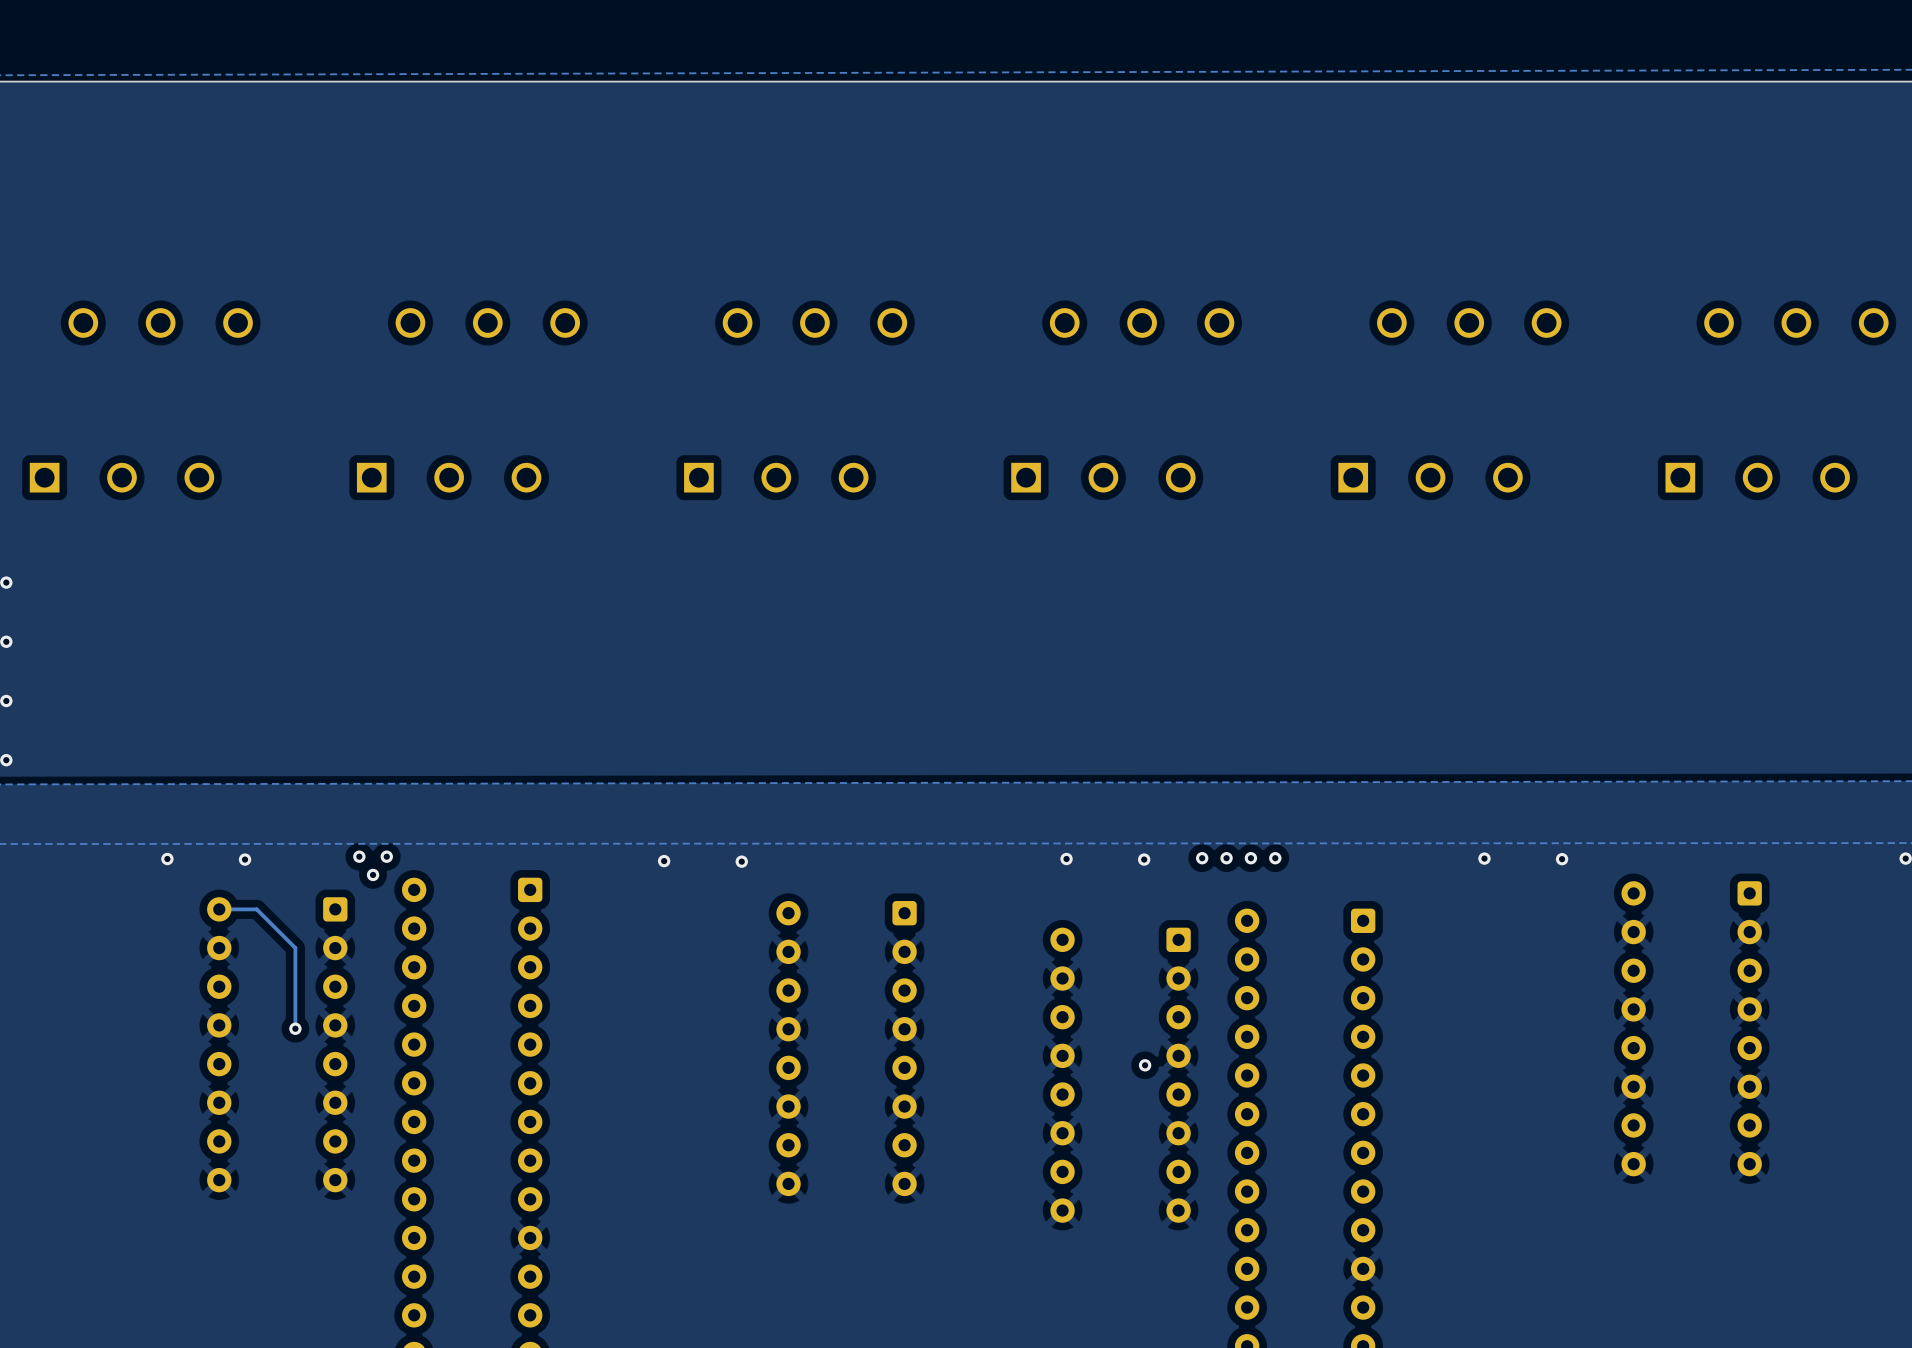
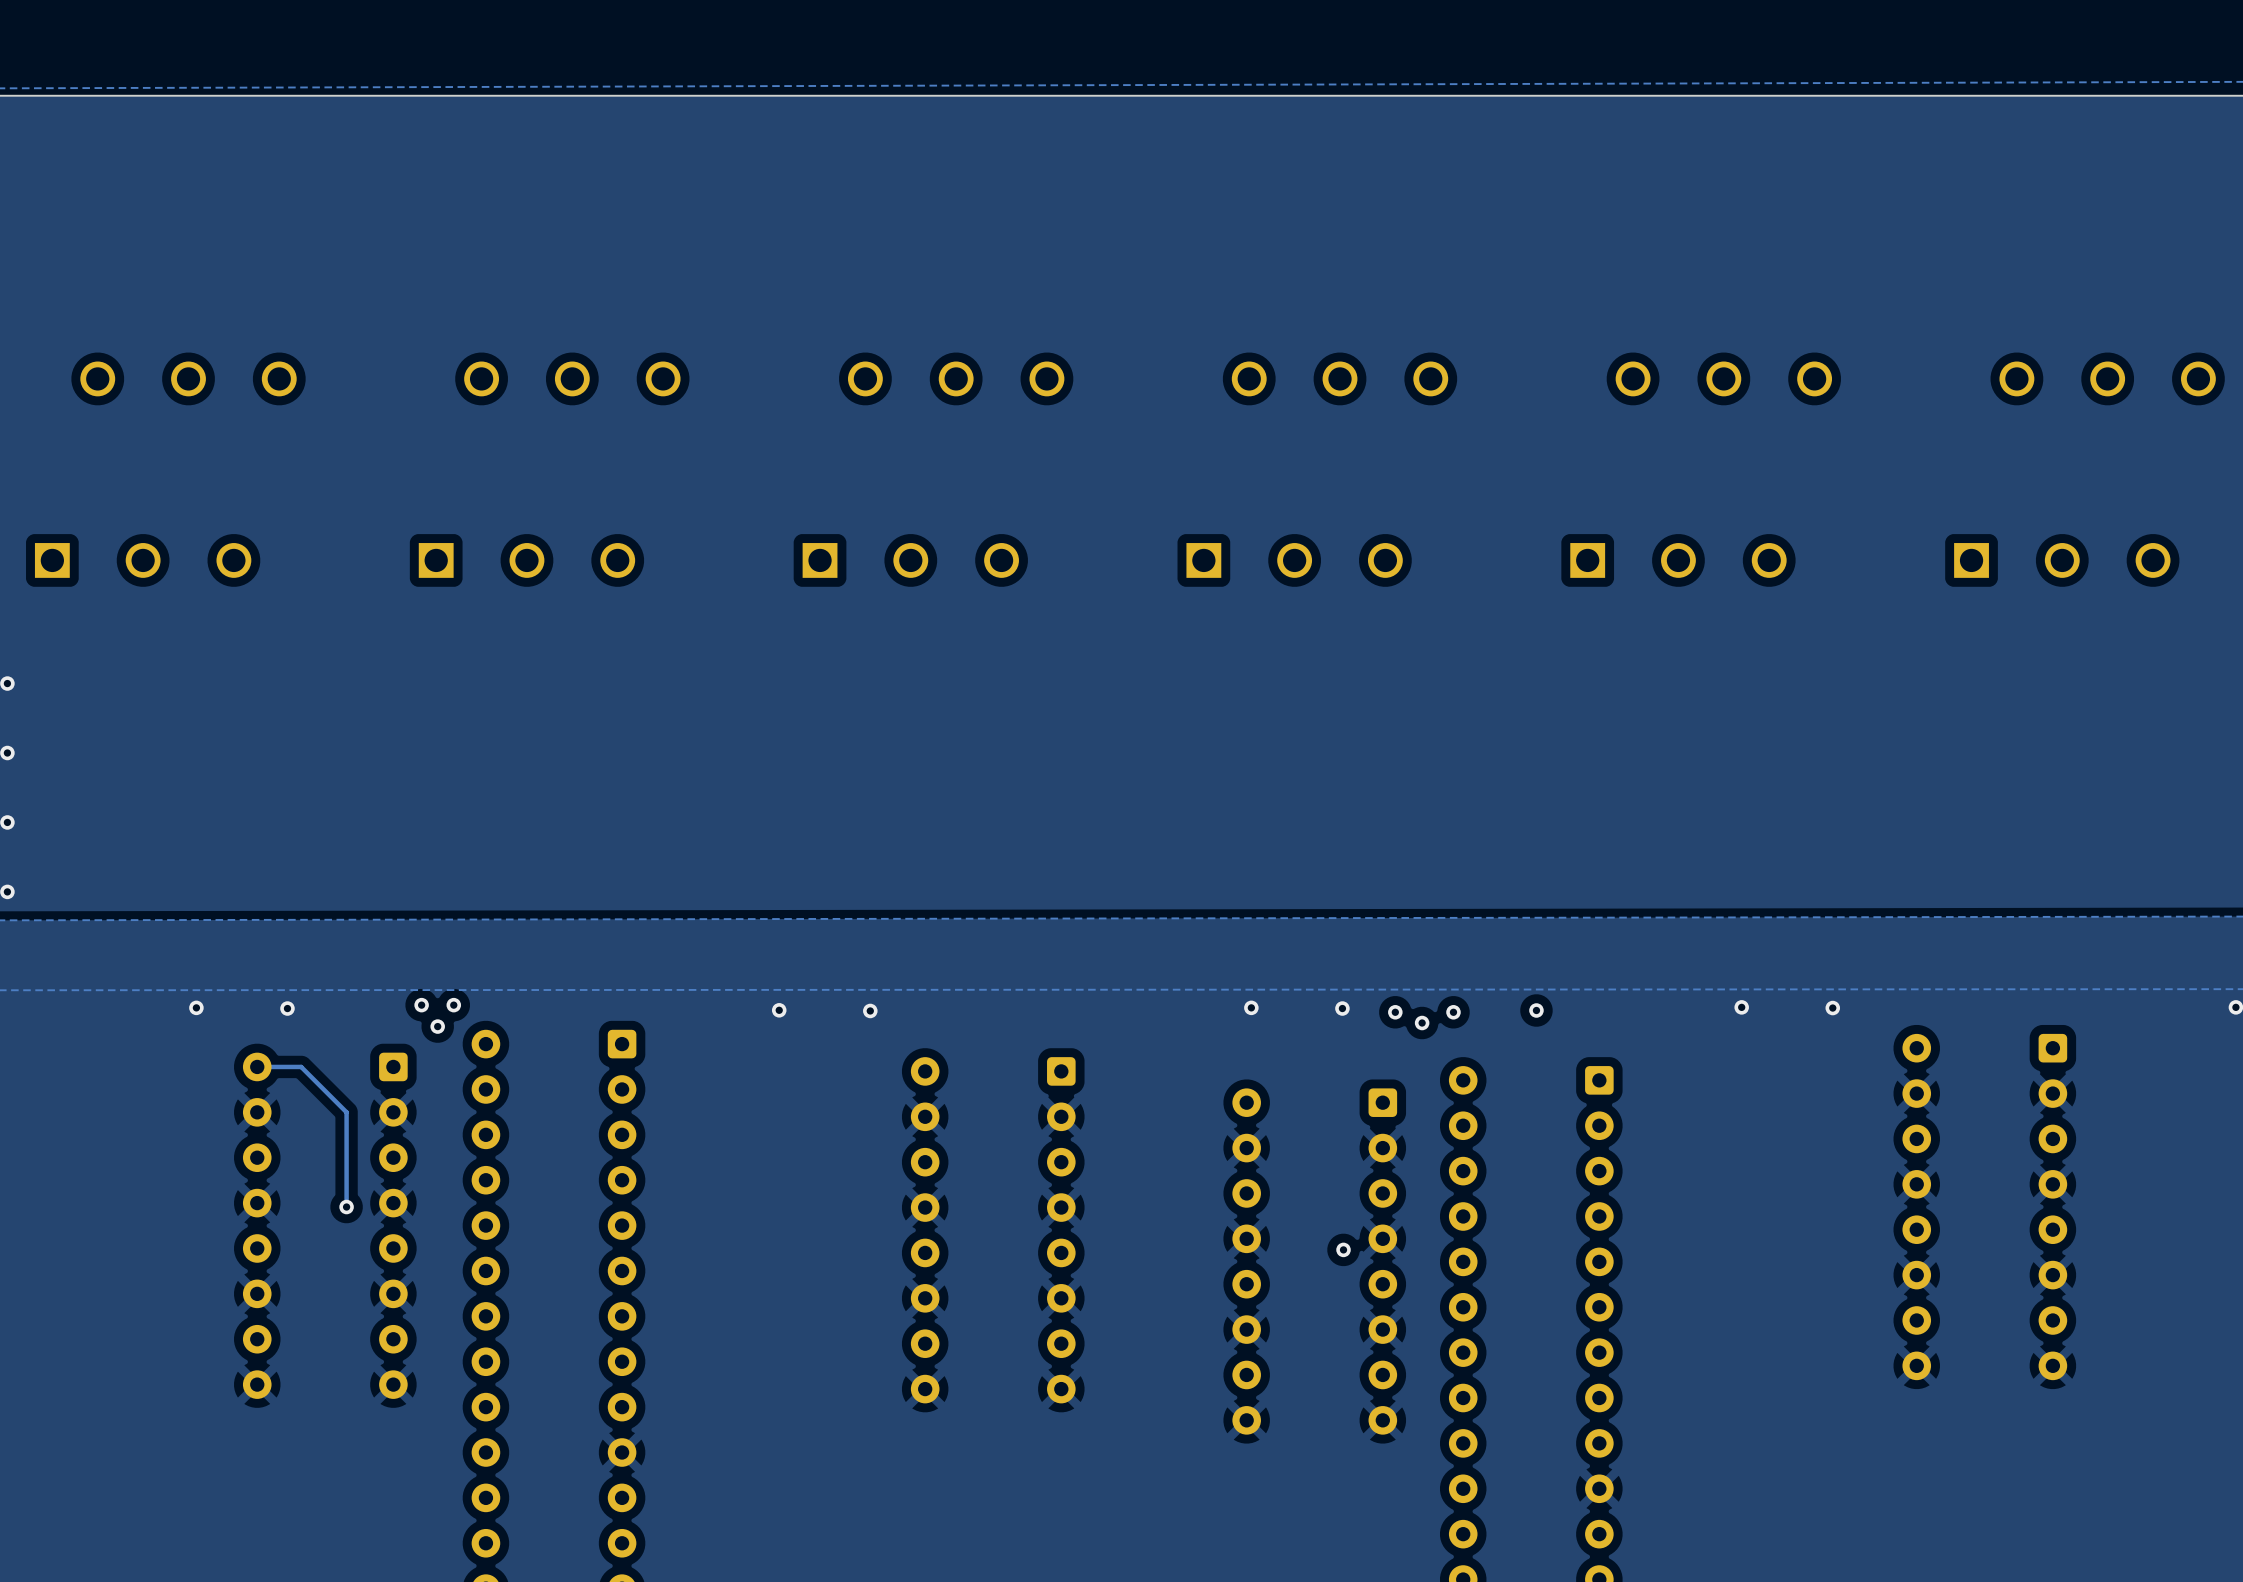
via: (1202, 858) -> none
via: (1226, 858) -> none
via: (1250, 858) -> none
via: (1275, 858) -> none
via: none -> (1536, 1010)
via: none -> (1395, 1012)
via: none -> (1453, 1012)
via: none -> (1422, 1023)

